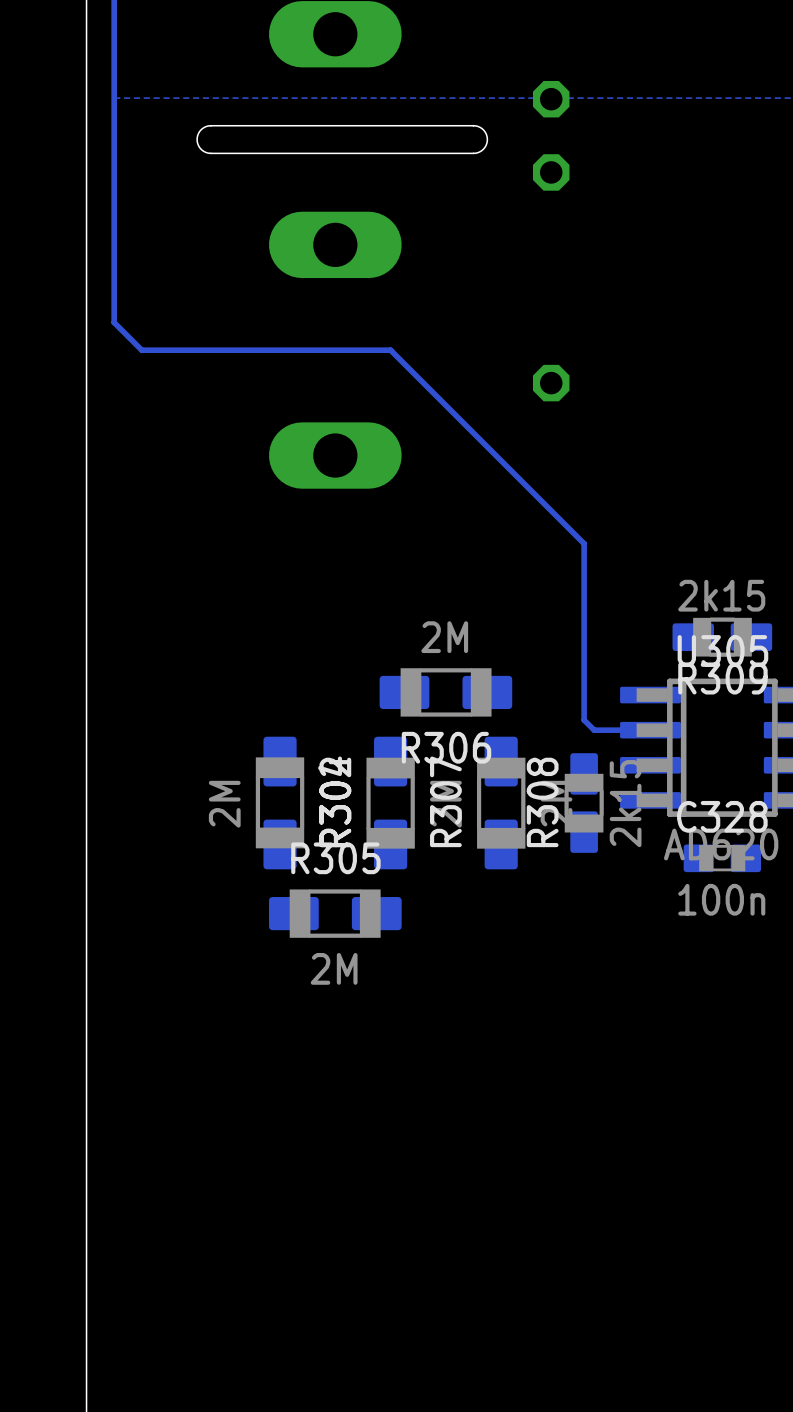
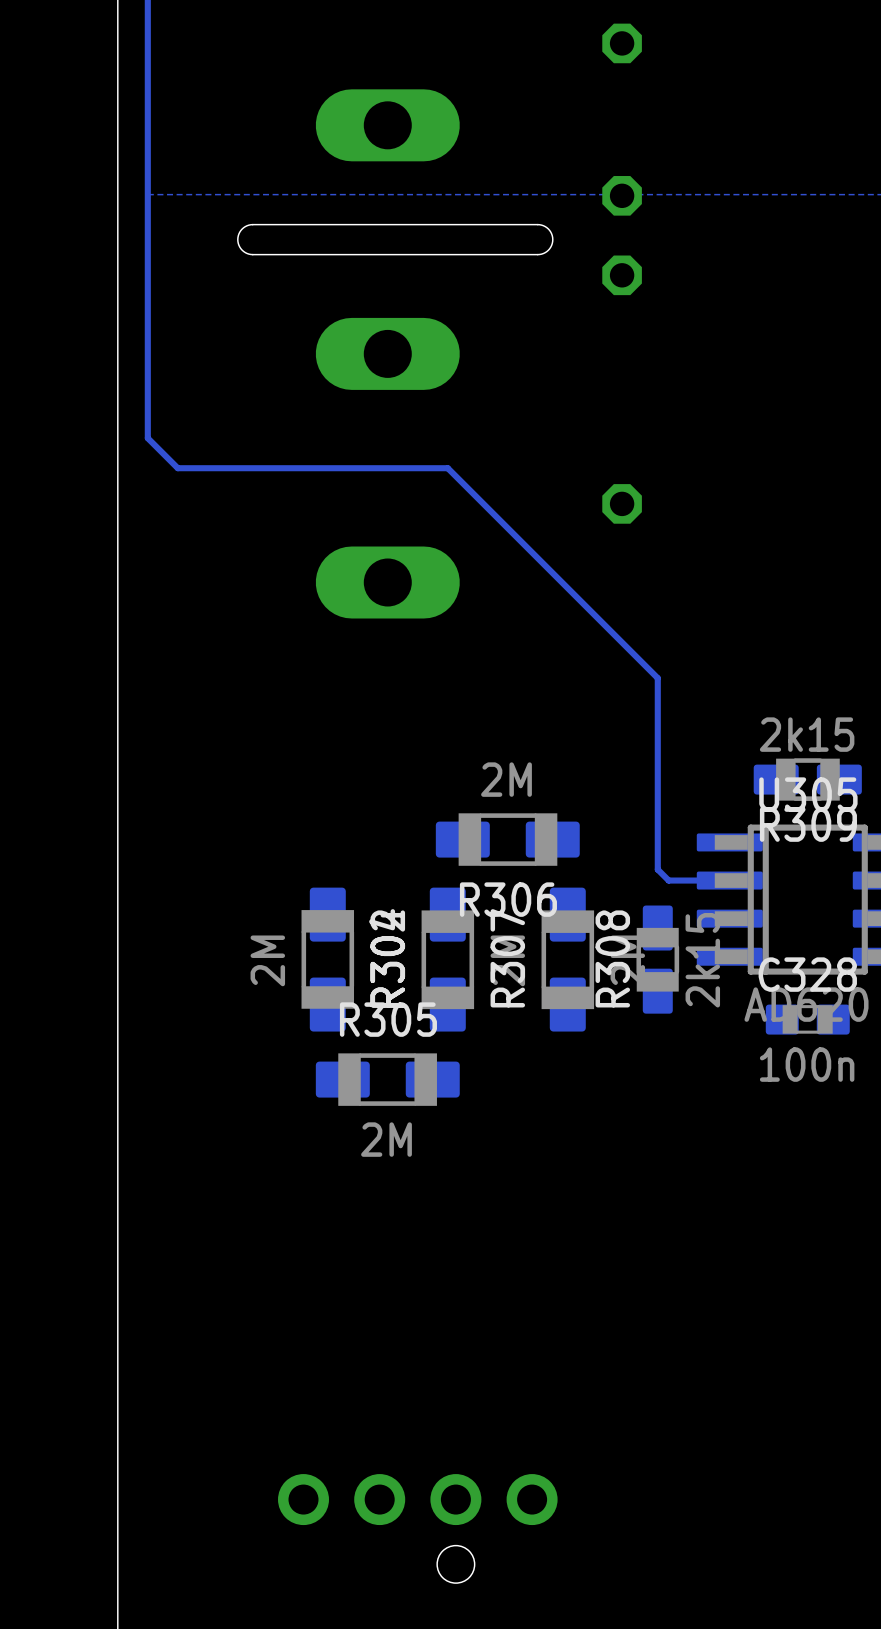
part: none -> (417, 1528)

